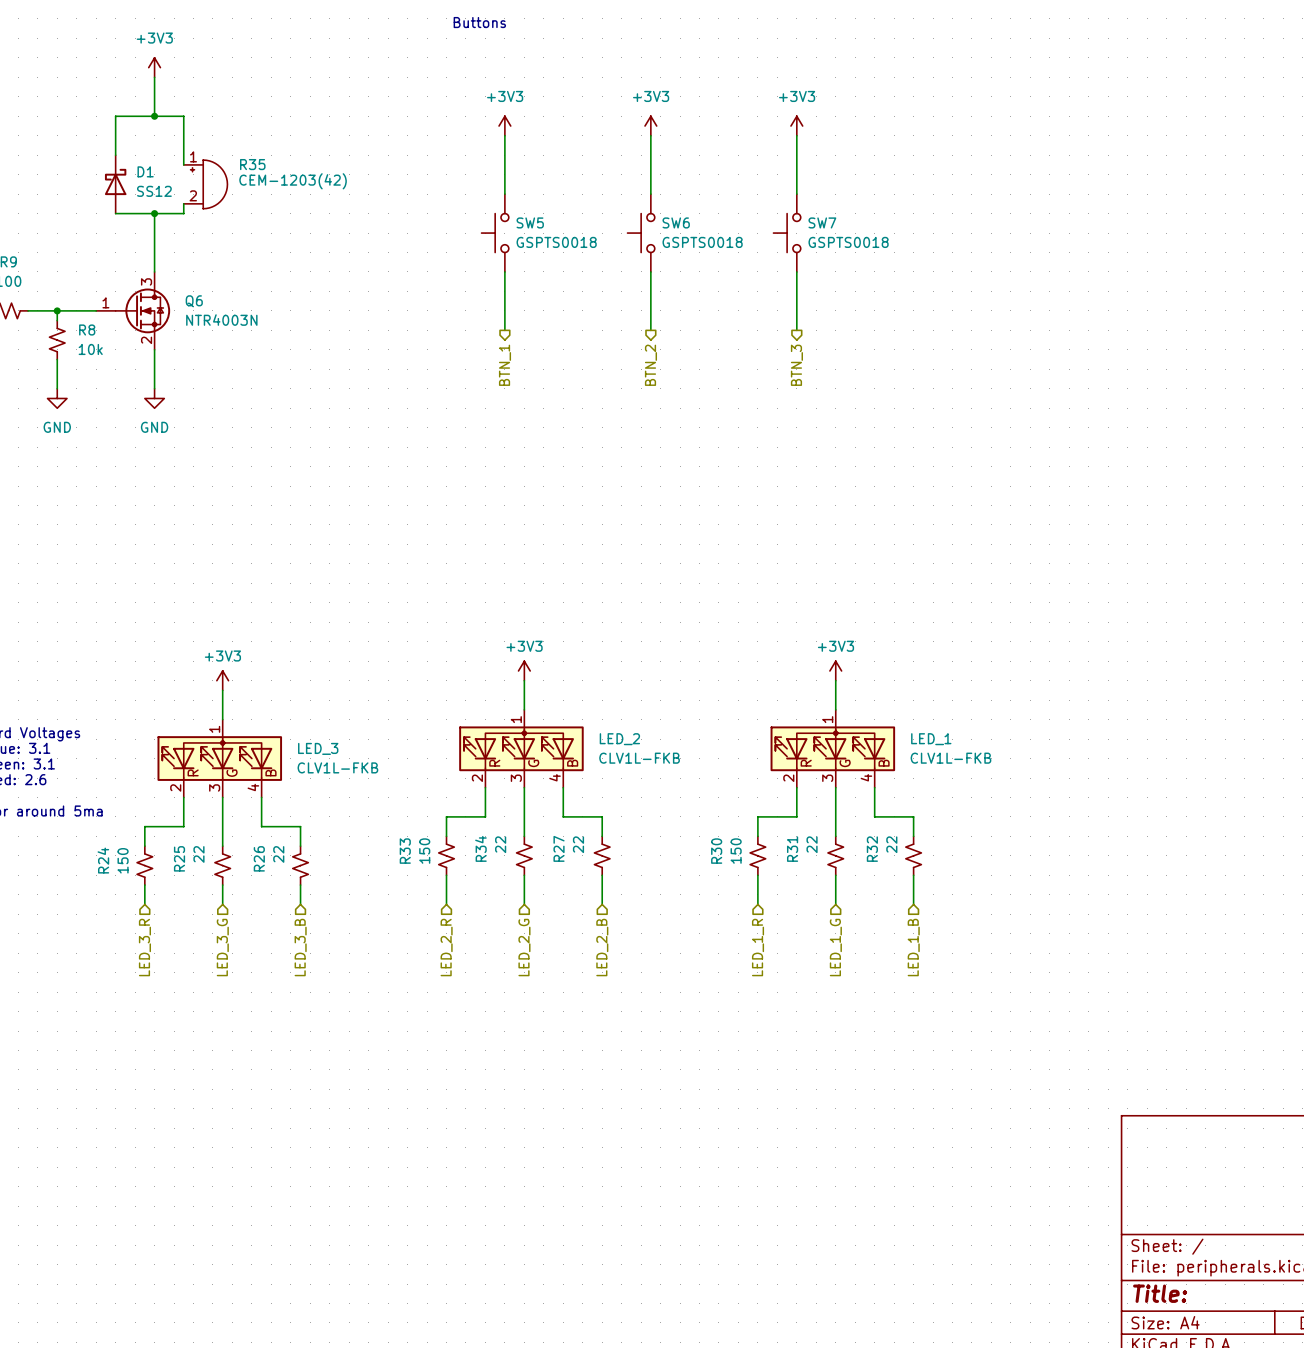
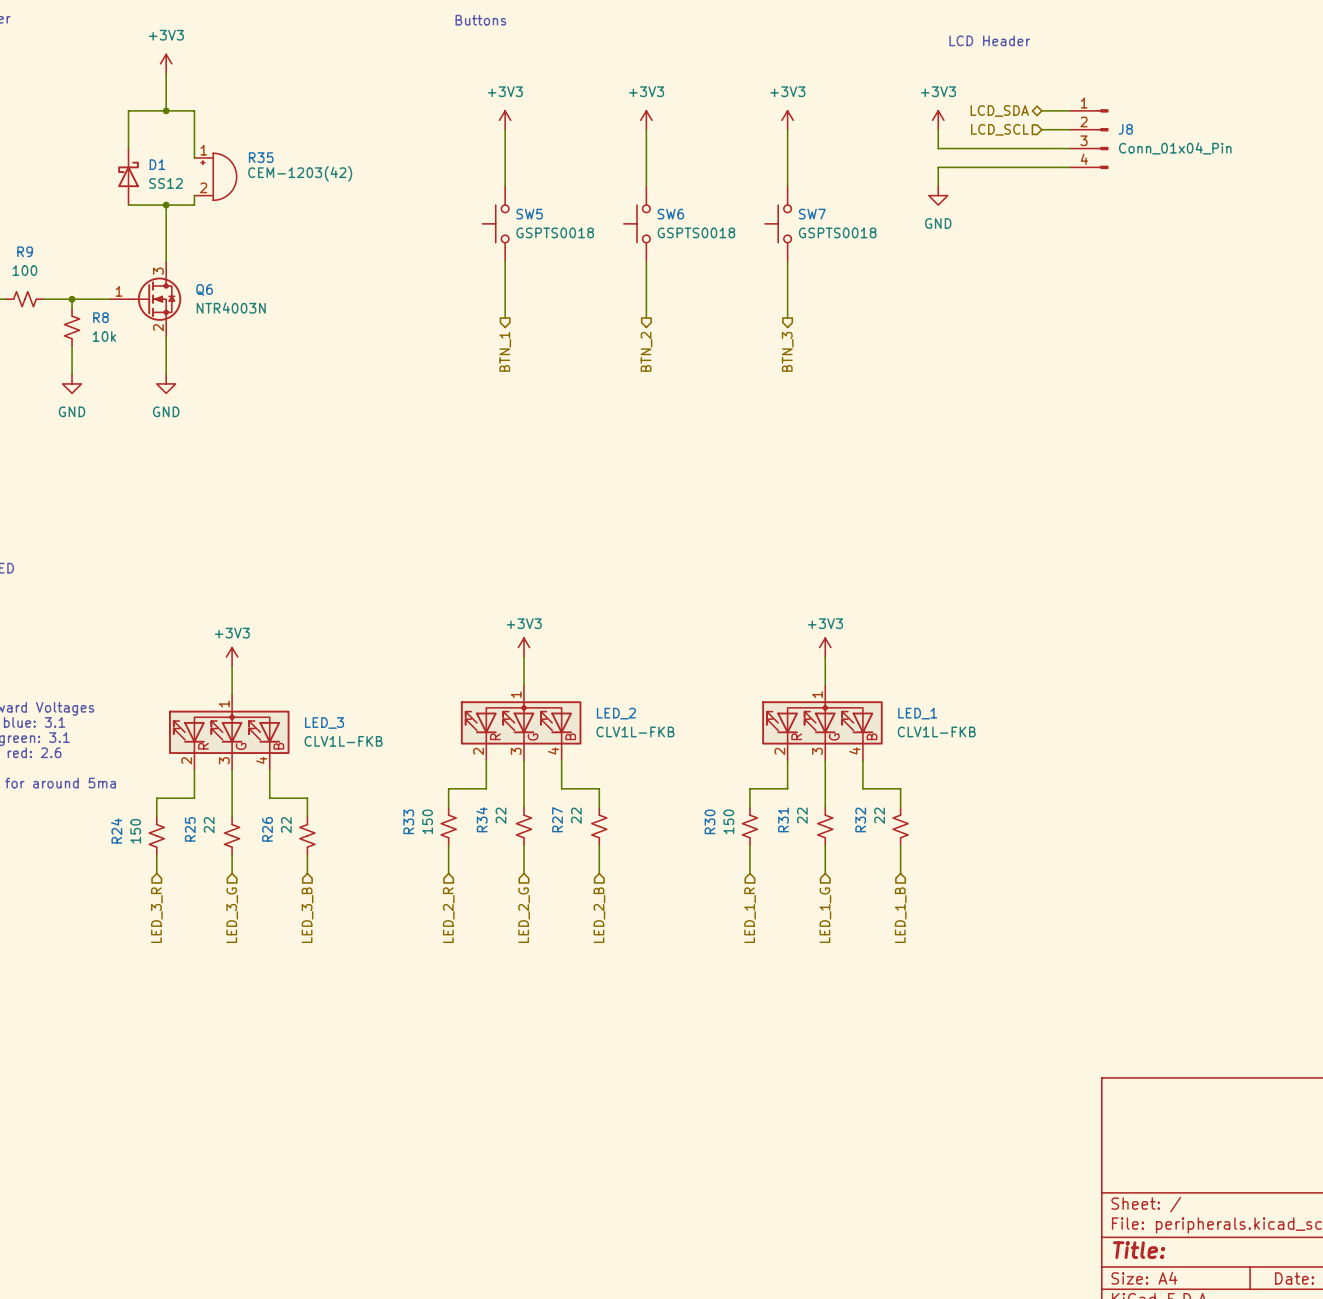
text: none -> LCD Header (989, 40)
hierarchical label: none -> LCD_SDA (999, 110)
wire: none -> (1041, 110) (1070, 110)
power symbol: none -> +3V3 (938, 120)
wire: none -> (938, 129) (938, 148) (1070, 148)
hierarchical label: none -> LCD_SCL (999, 129)
wire: none -> (1041, 129) (1070, 129)
J8: none -> Conn_01x04_Pin (1089, 139)
wire: none -> (1070, 167) (938, 167) (938, 186)
power symbol: none -> GND (938, 195)

